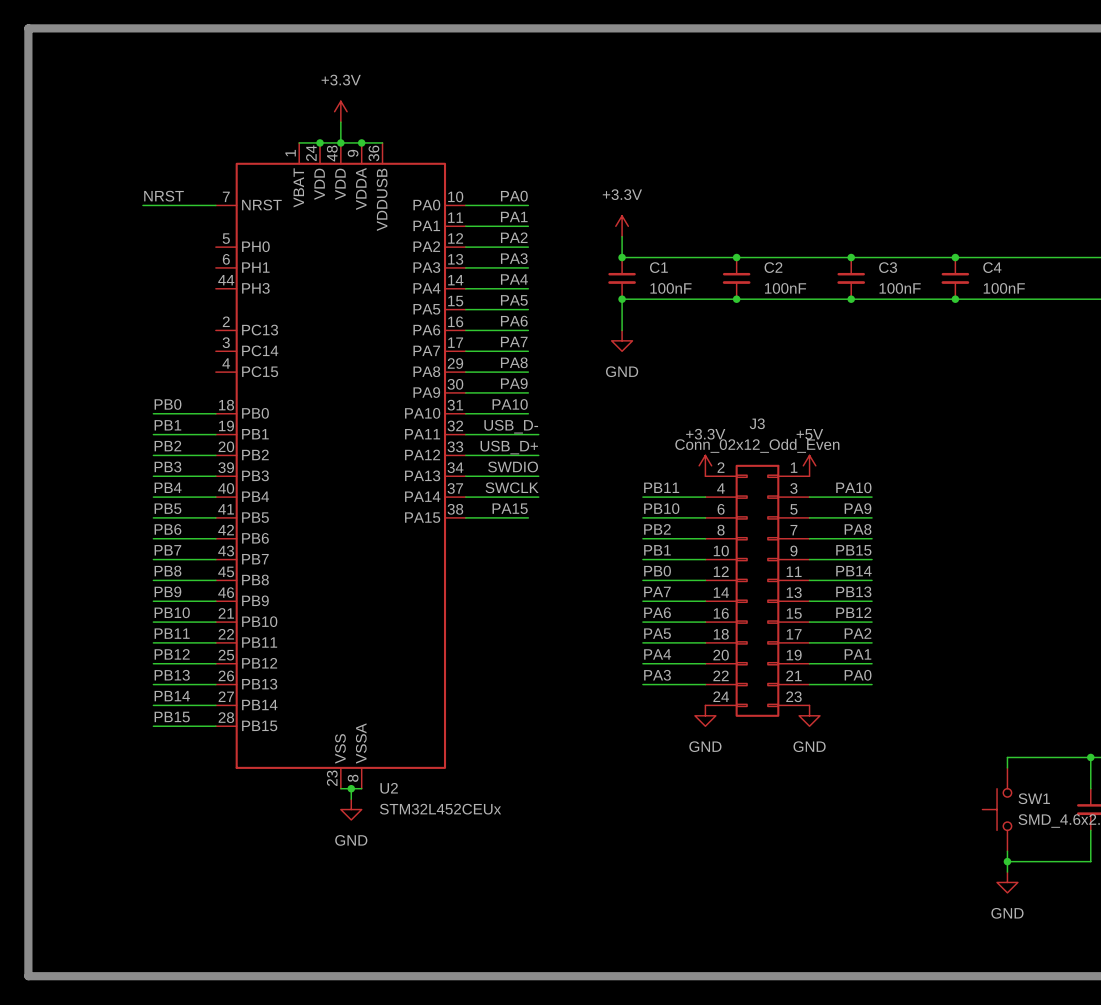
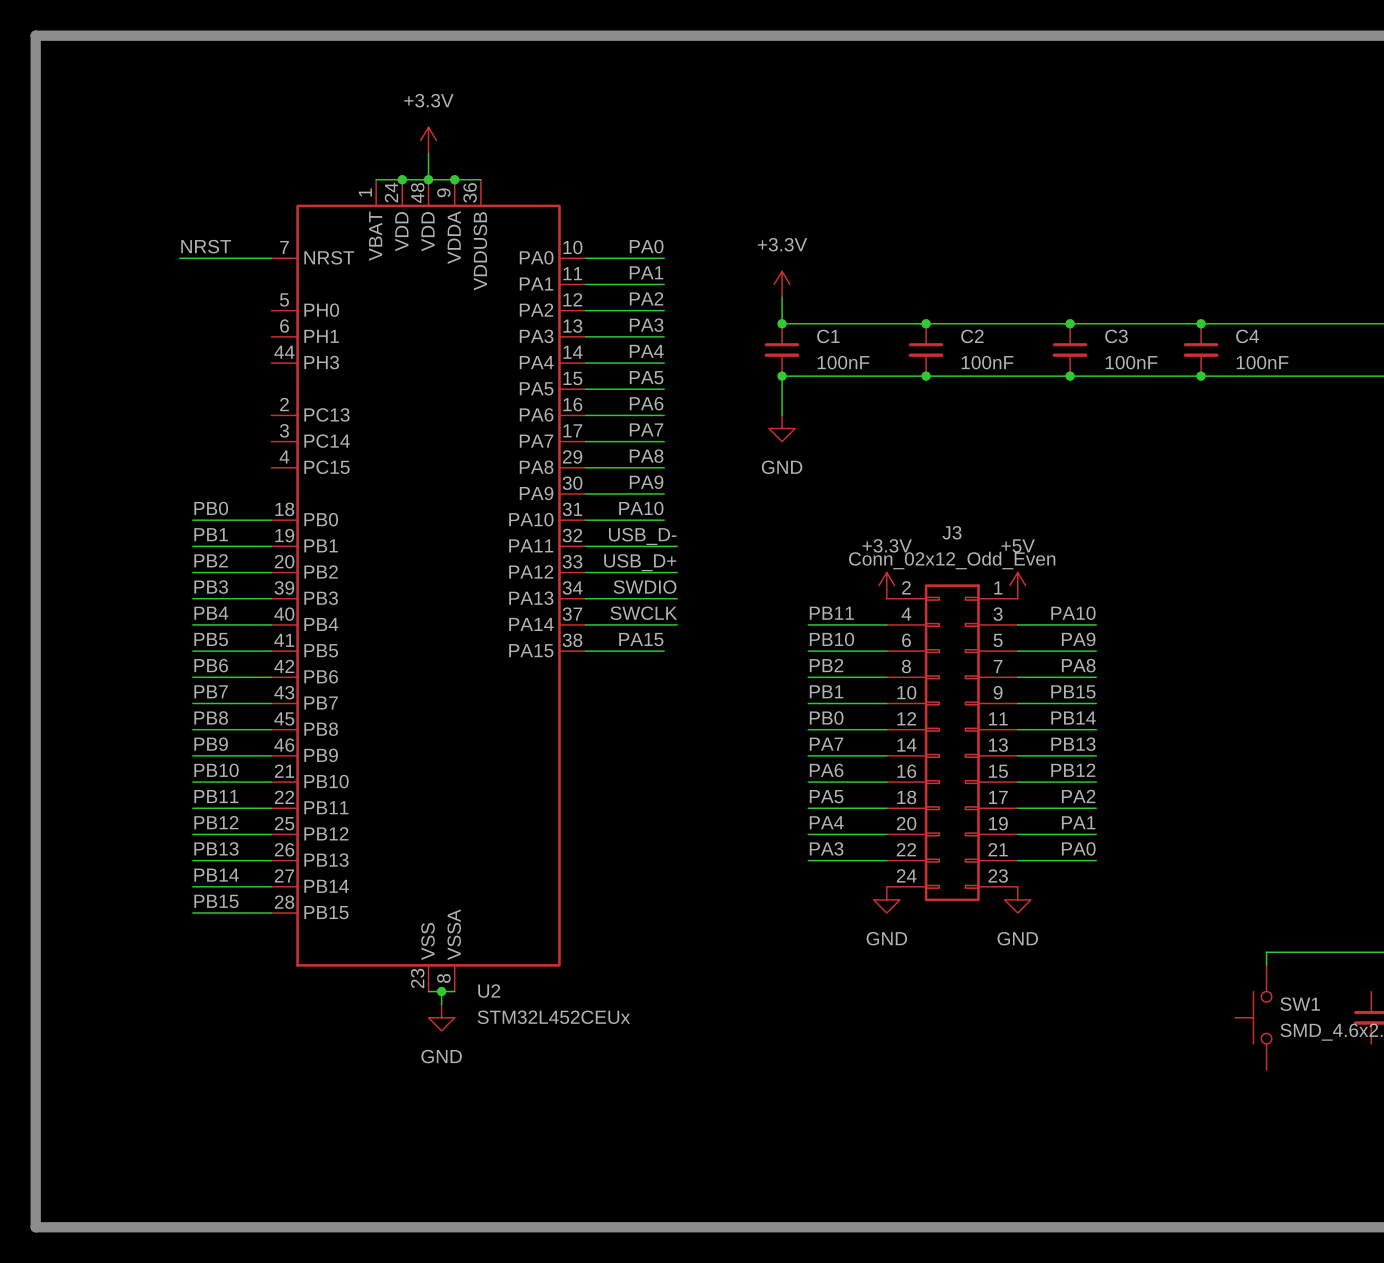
wire: (1090, 757) (1090, 788) -> none
junction: (1090, 757) -> none
wire: (1090, 830) (1090, 861) (1007, 861) -> none
wire: (1007, 851) (1007, 872) -> none
junction: (1007, 861) -> none
power symbol: GND (1007, 882) -> none

